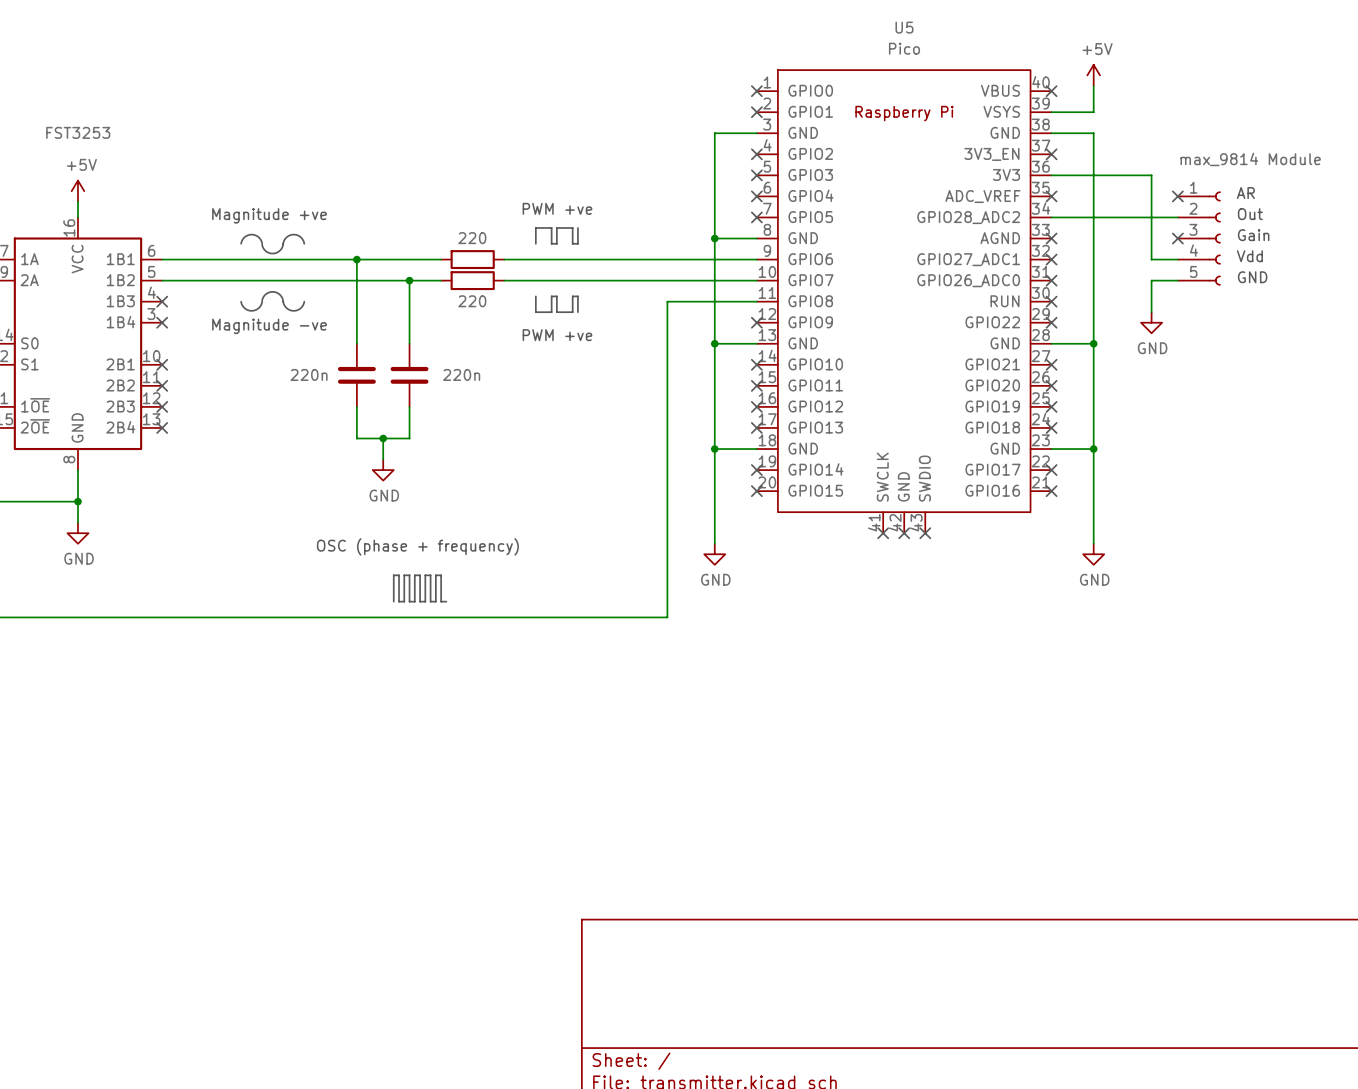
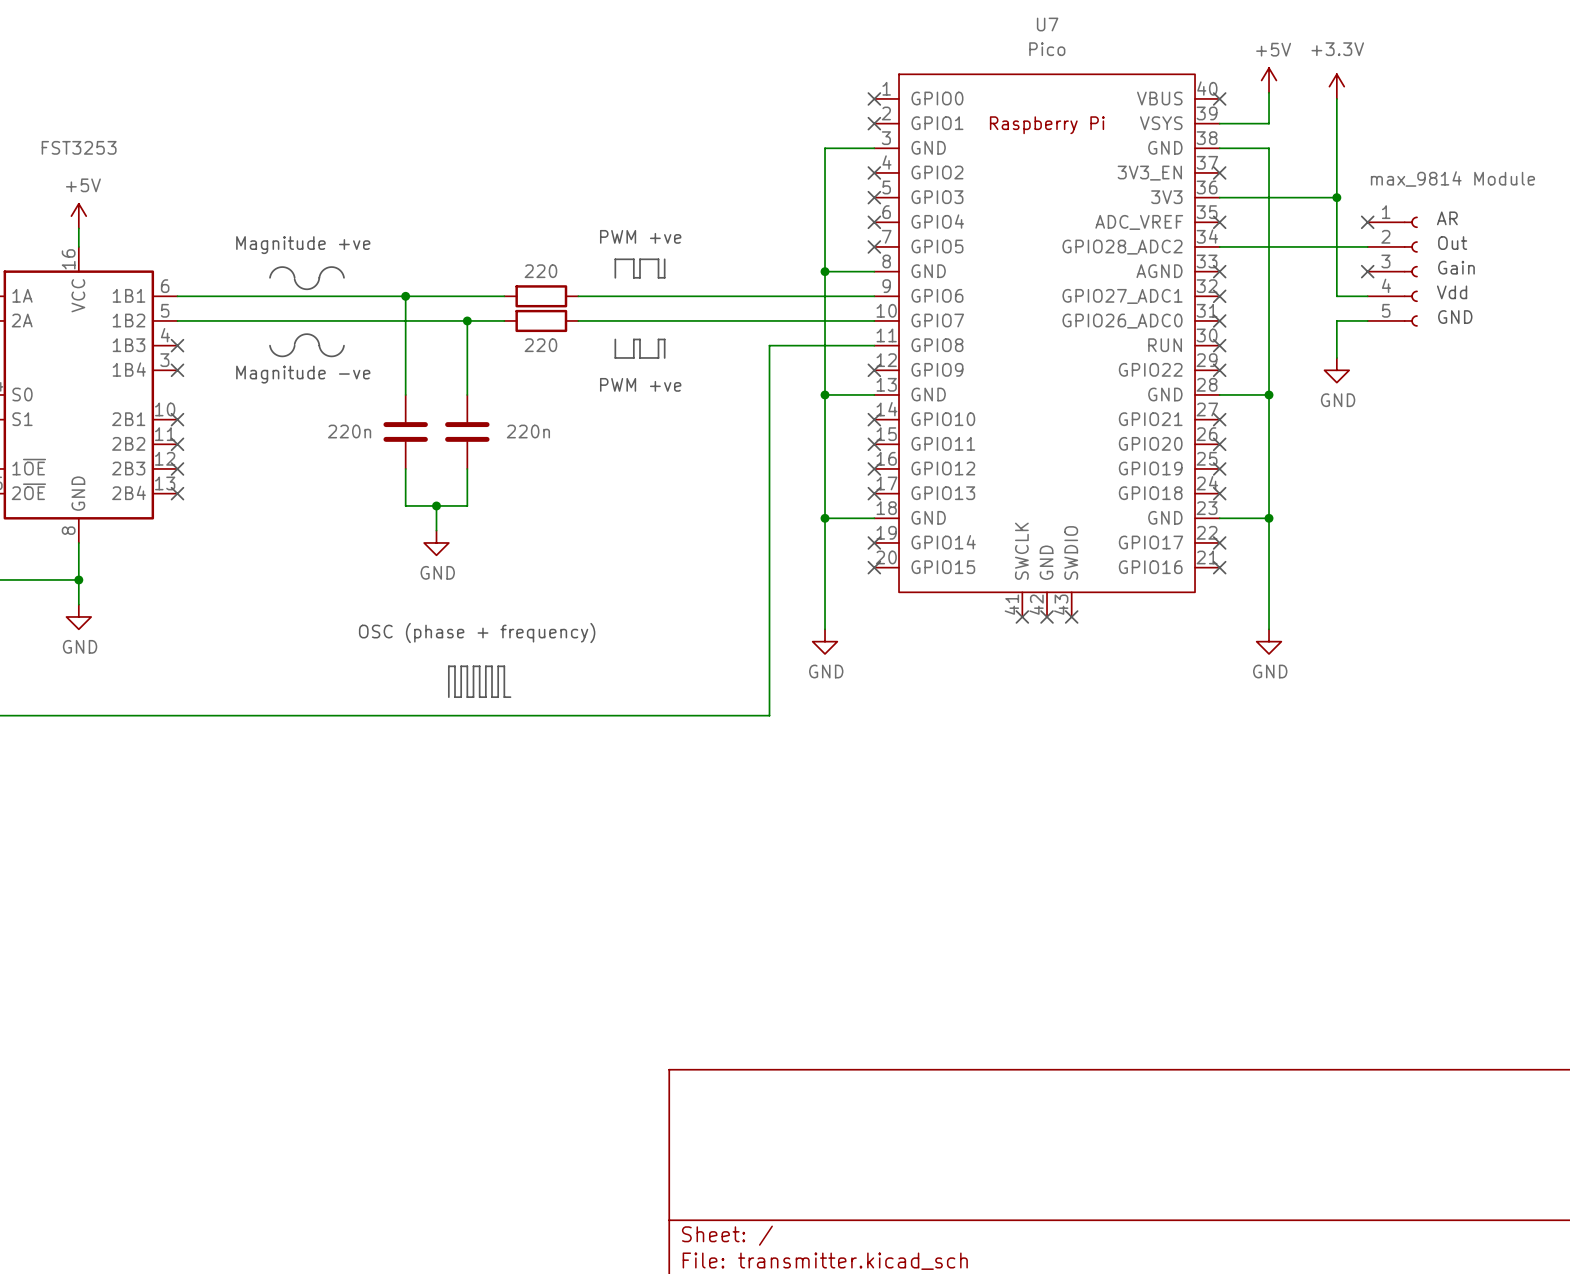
U5 name: U5 (904, 27) -> U7 (1047, 24)
power symbol: none -> +3.3V (1336, 86)
wire: none -> (1336, 98) (1336, 197)
junction: none -> (1336, 197)

